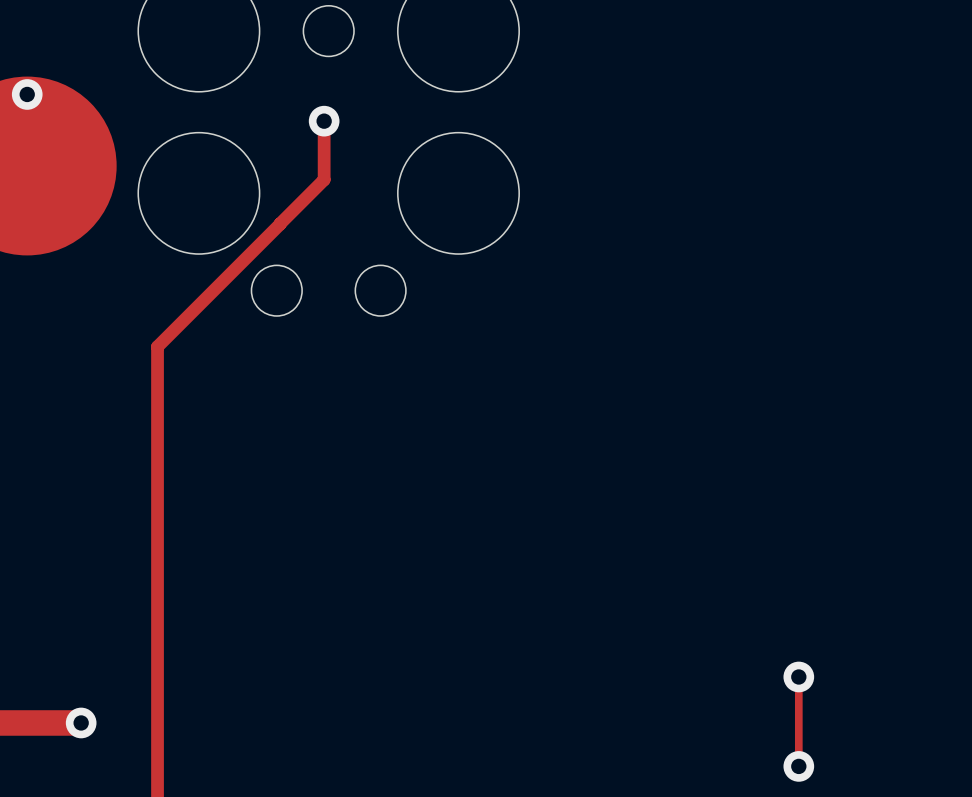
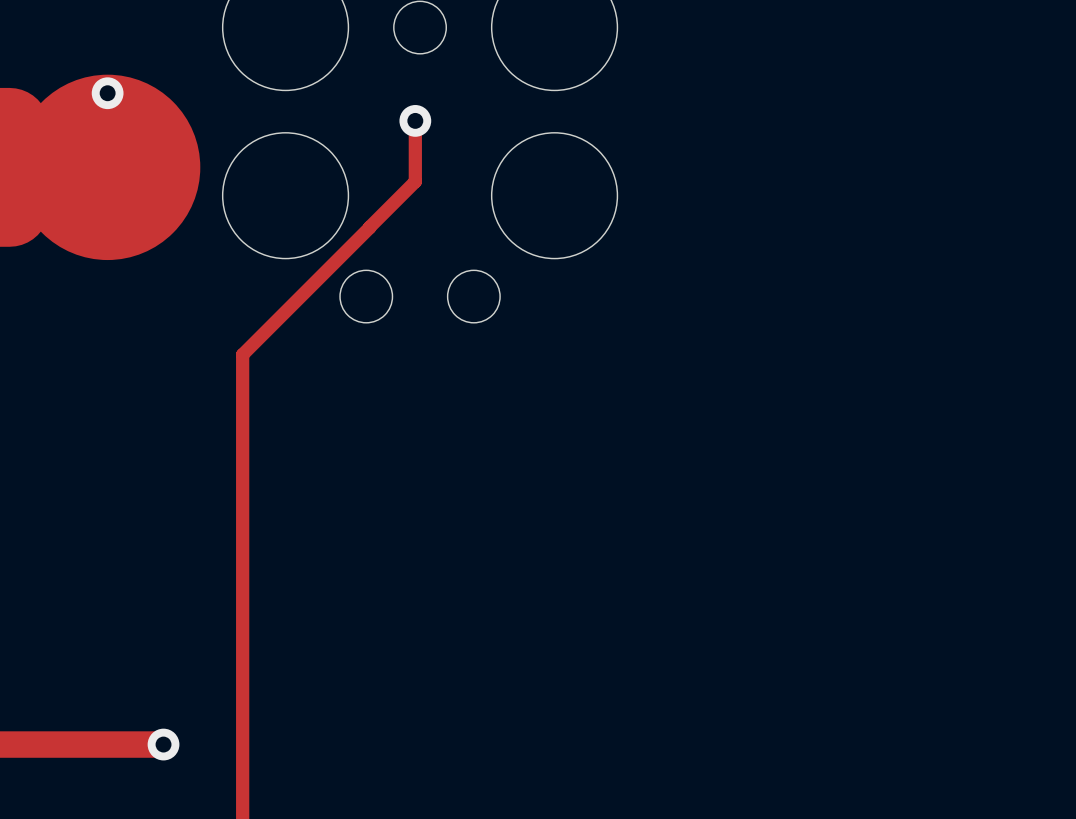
track: (798, 676) (798, 766) -> none
via: (798, 676) -> none
via: (798, 766) -> none

